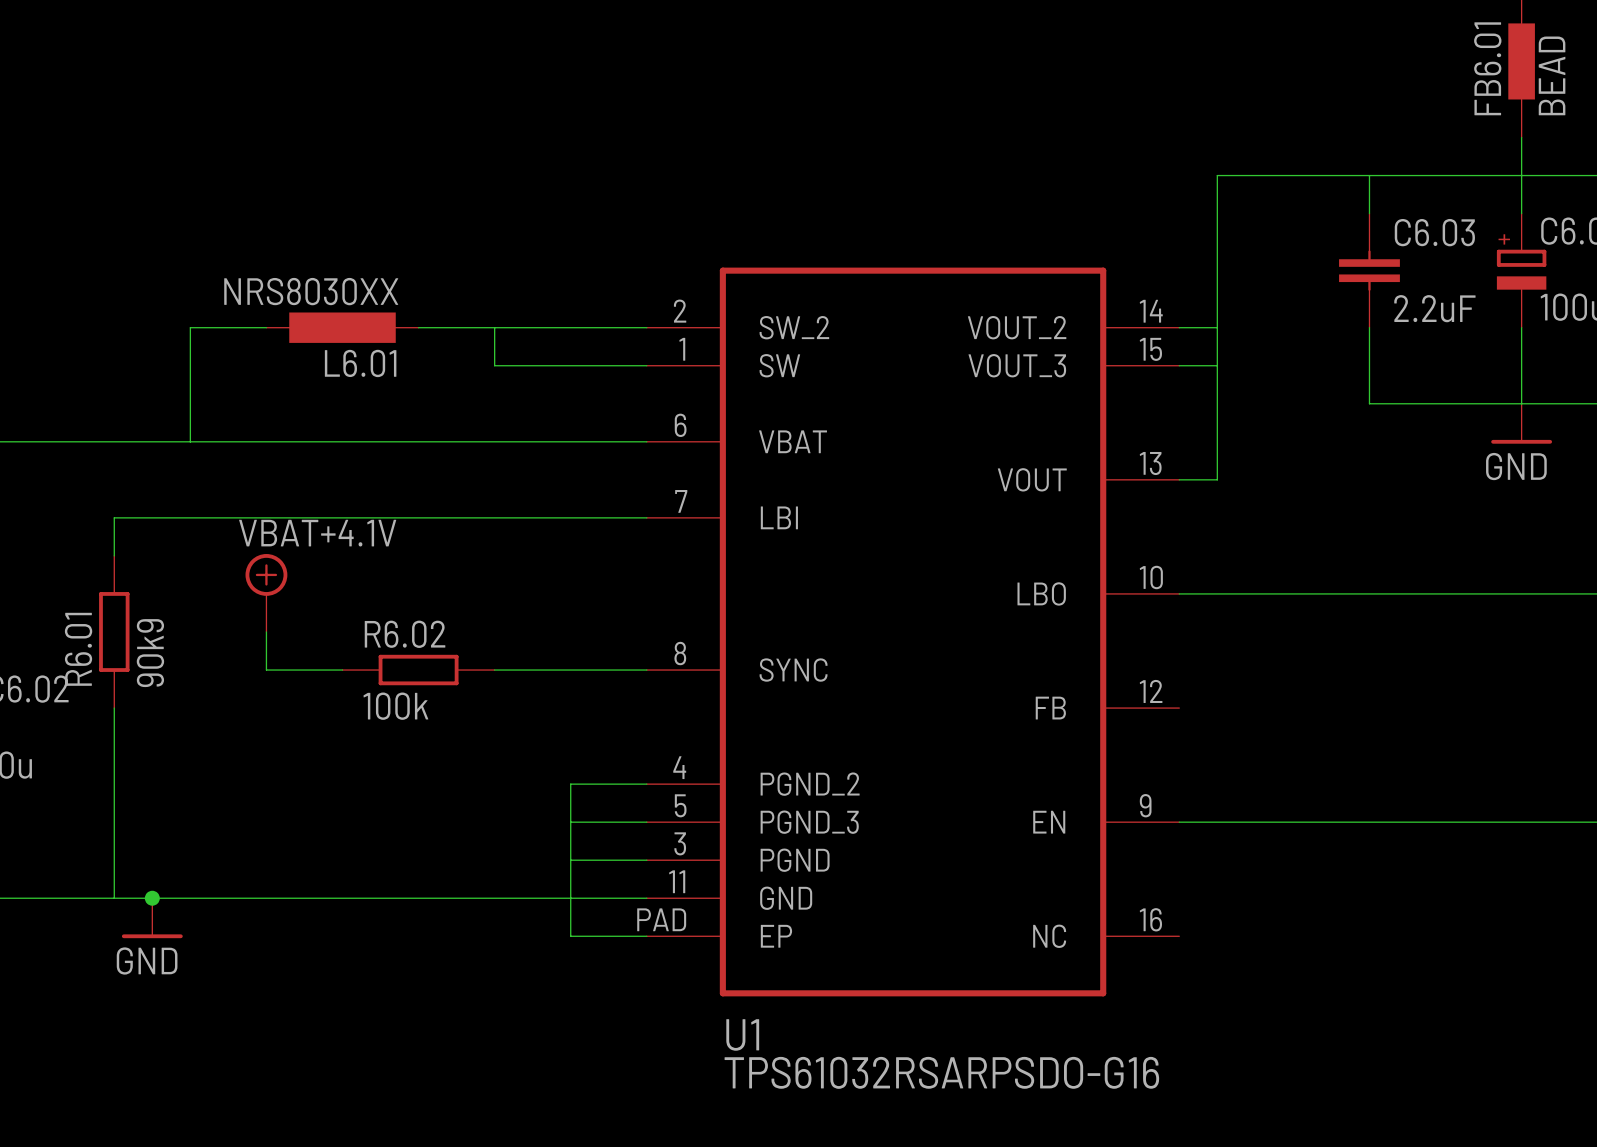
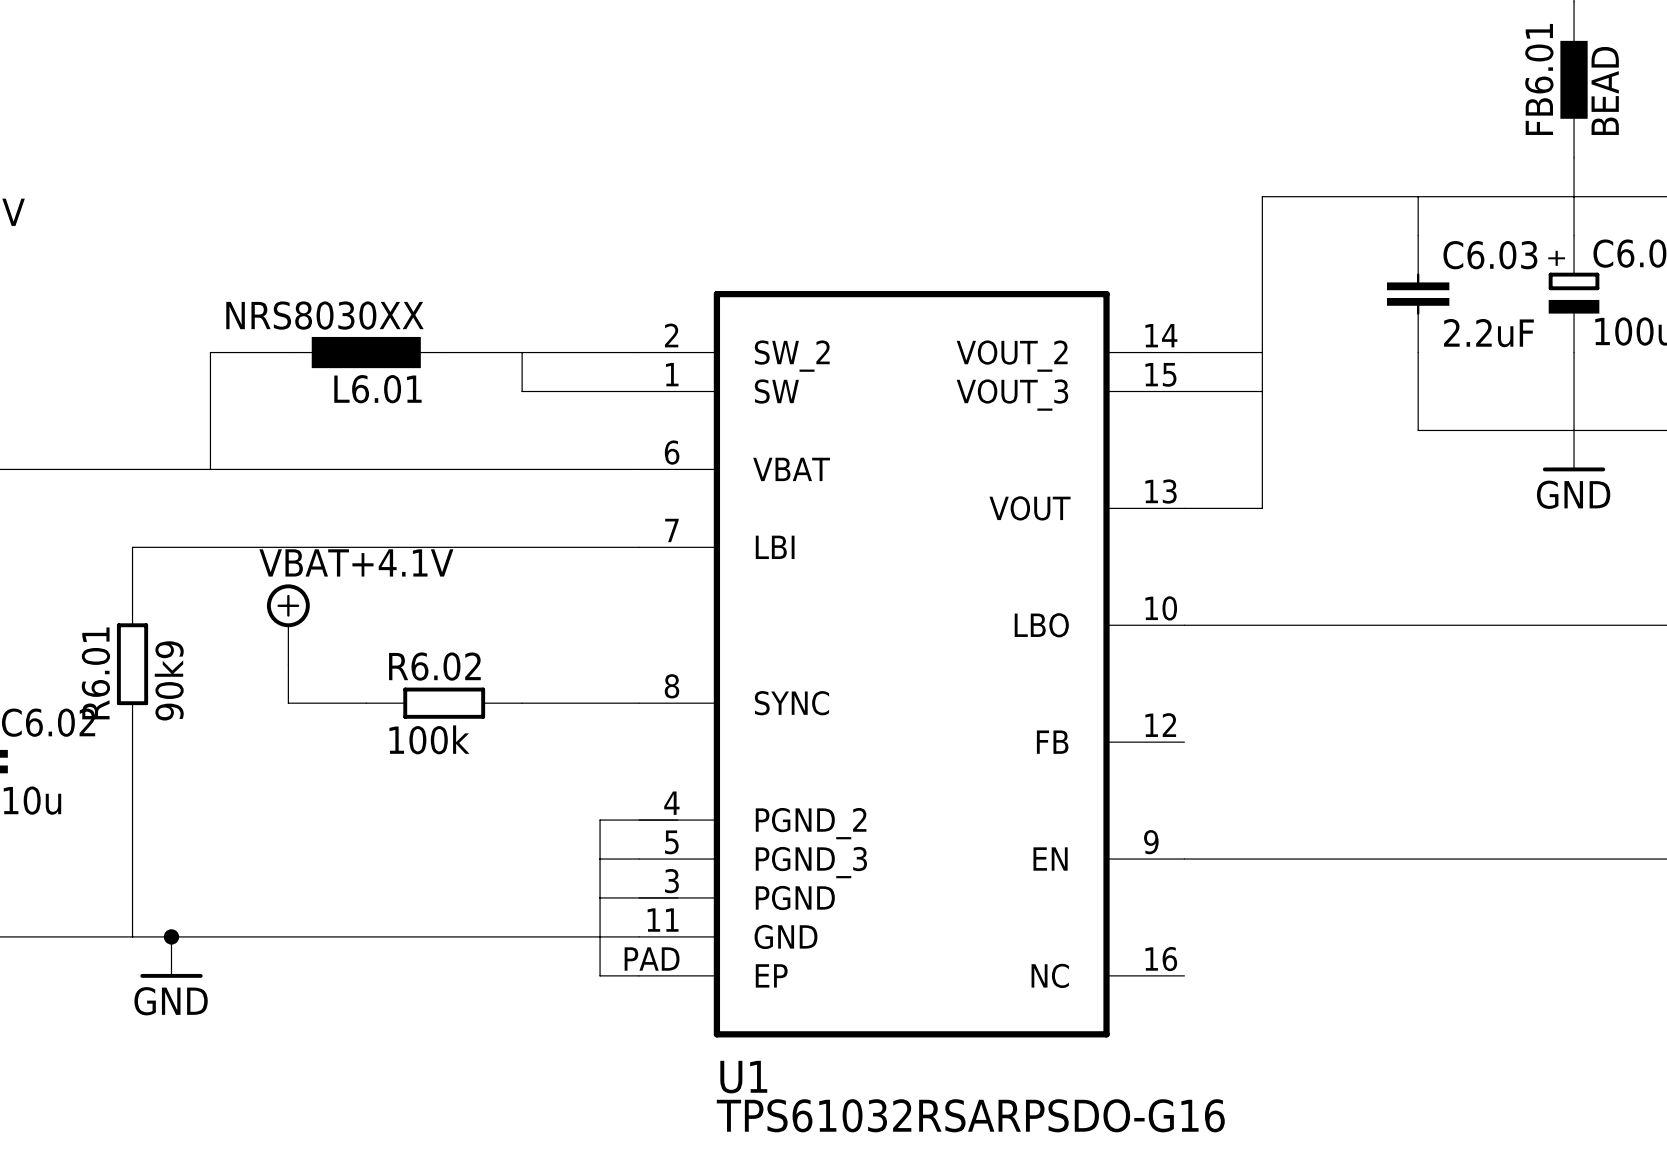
U1 position: (913, 631) -> (911, 664)

